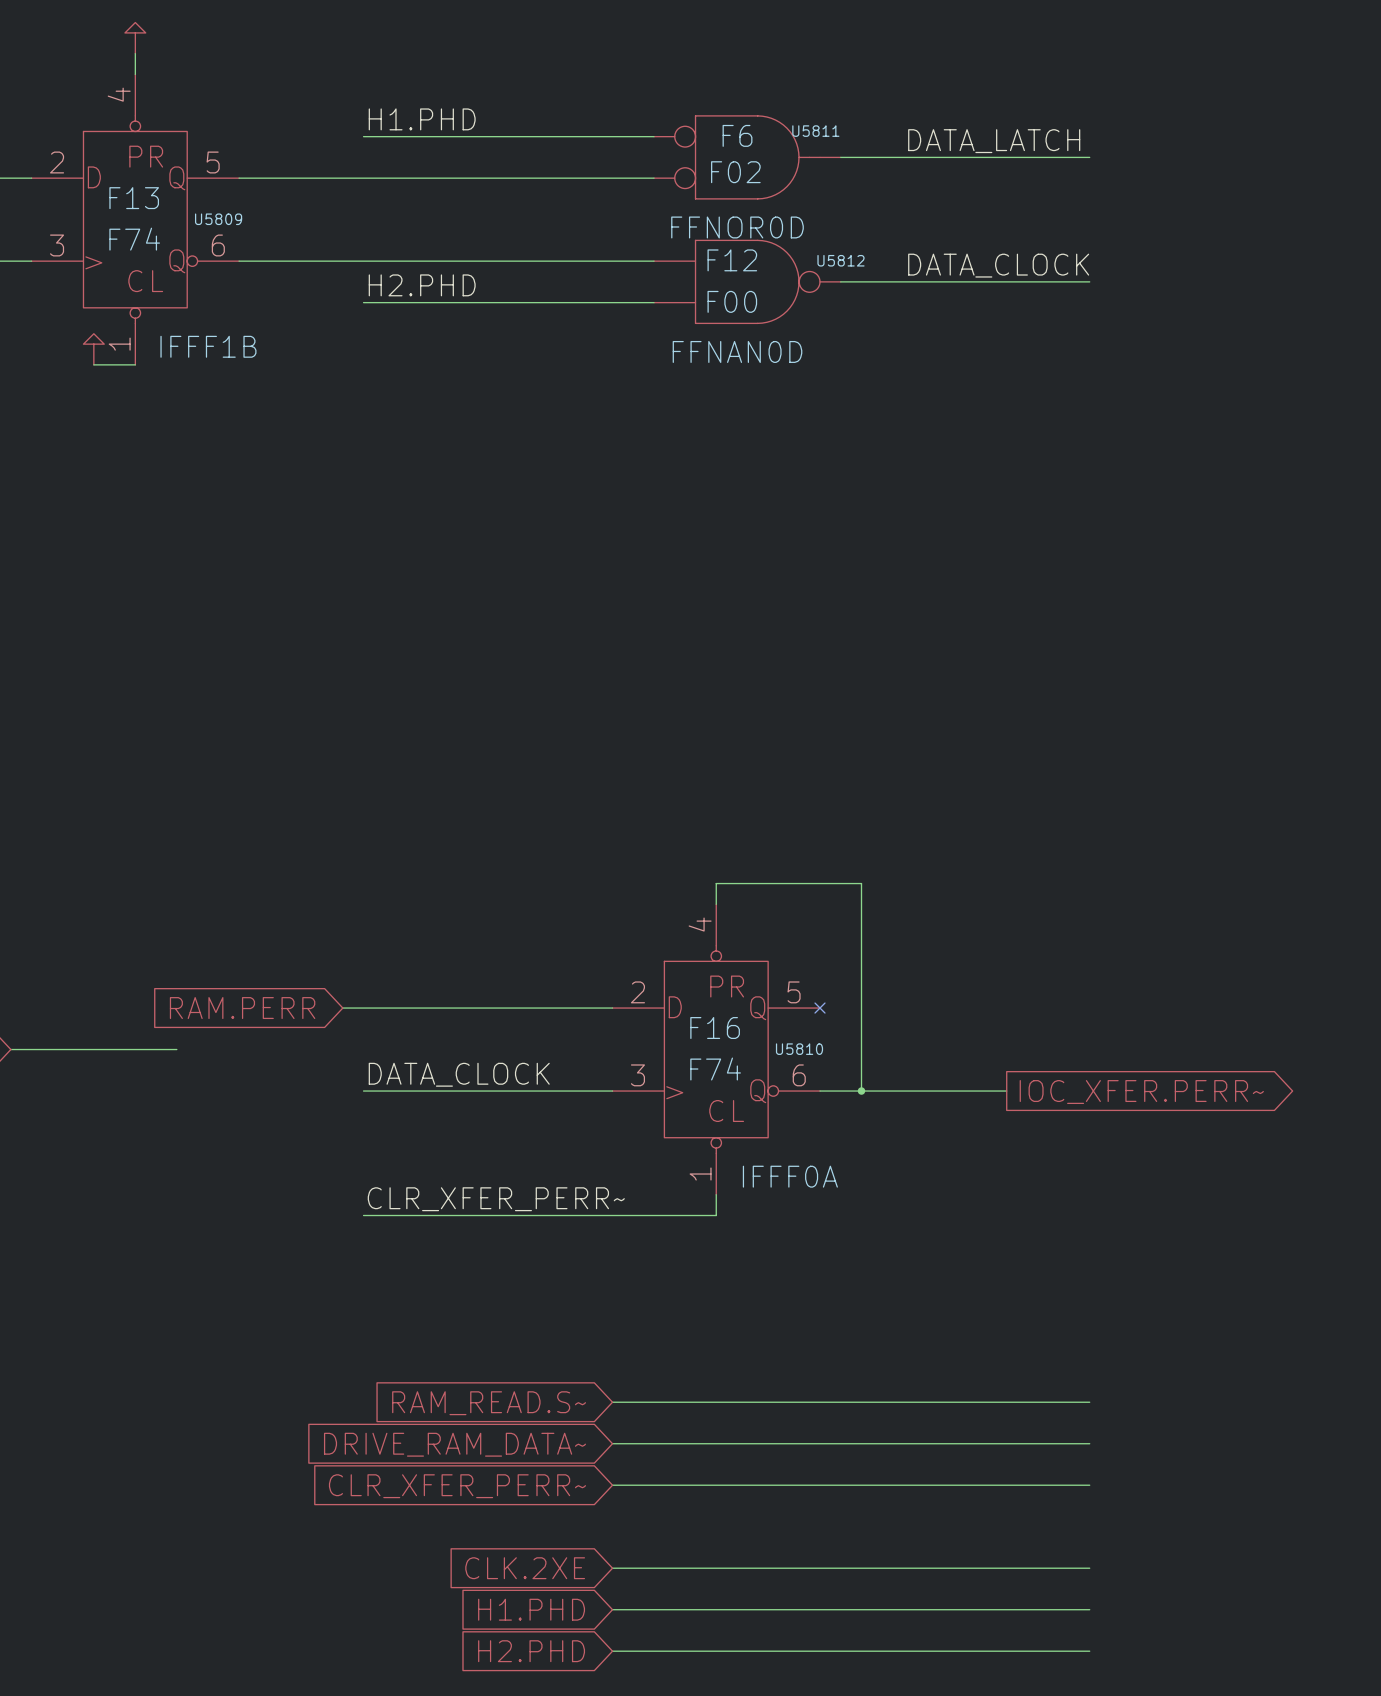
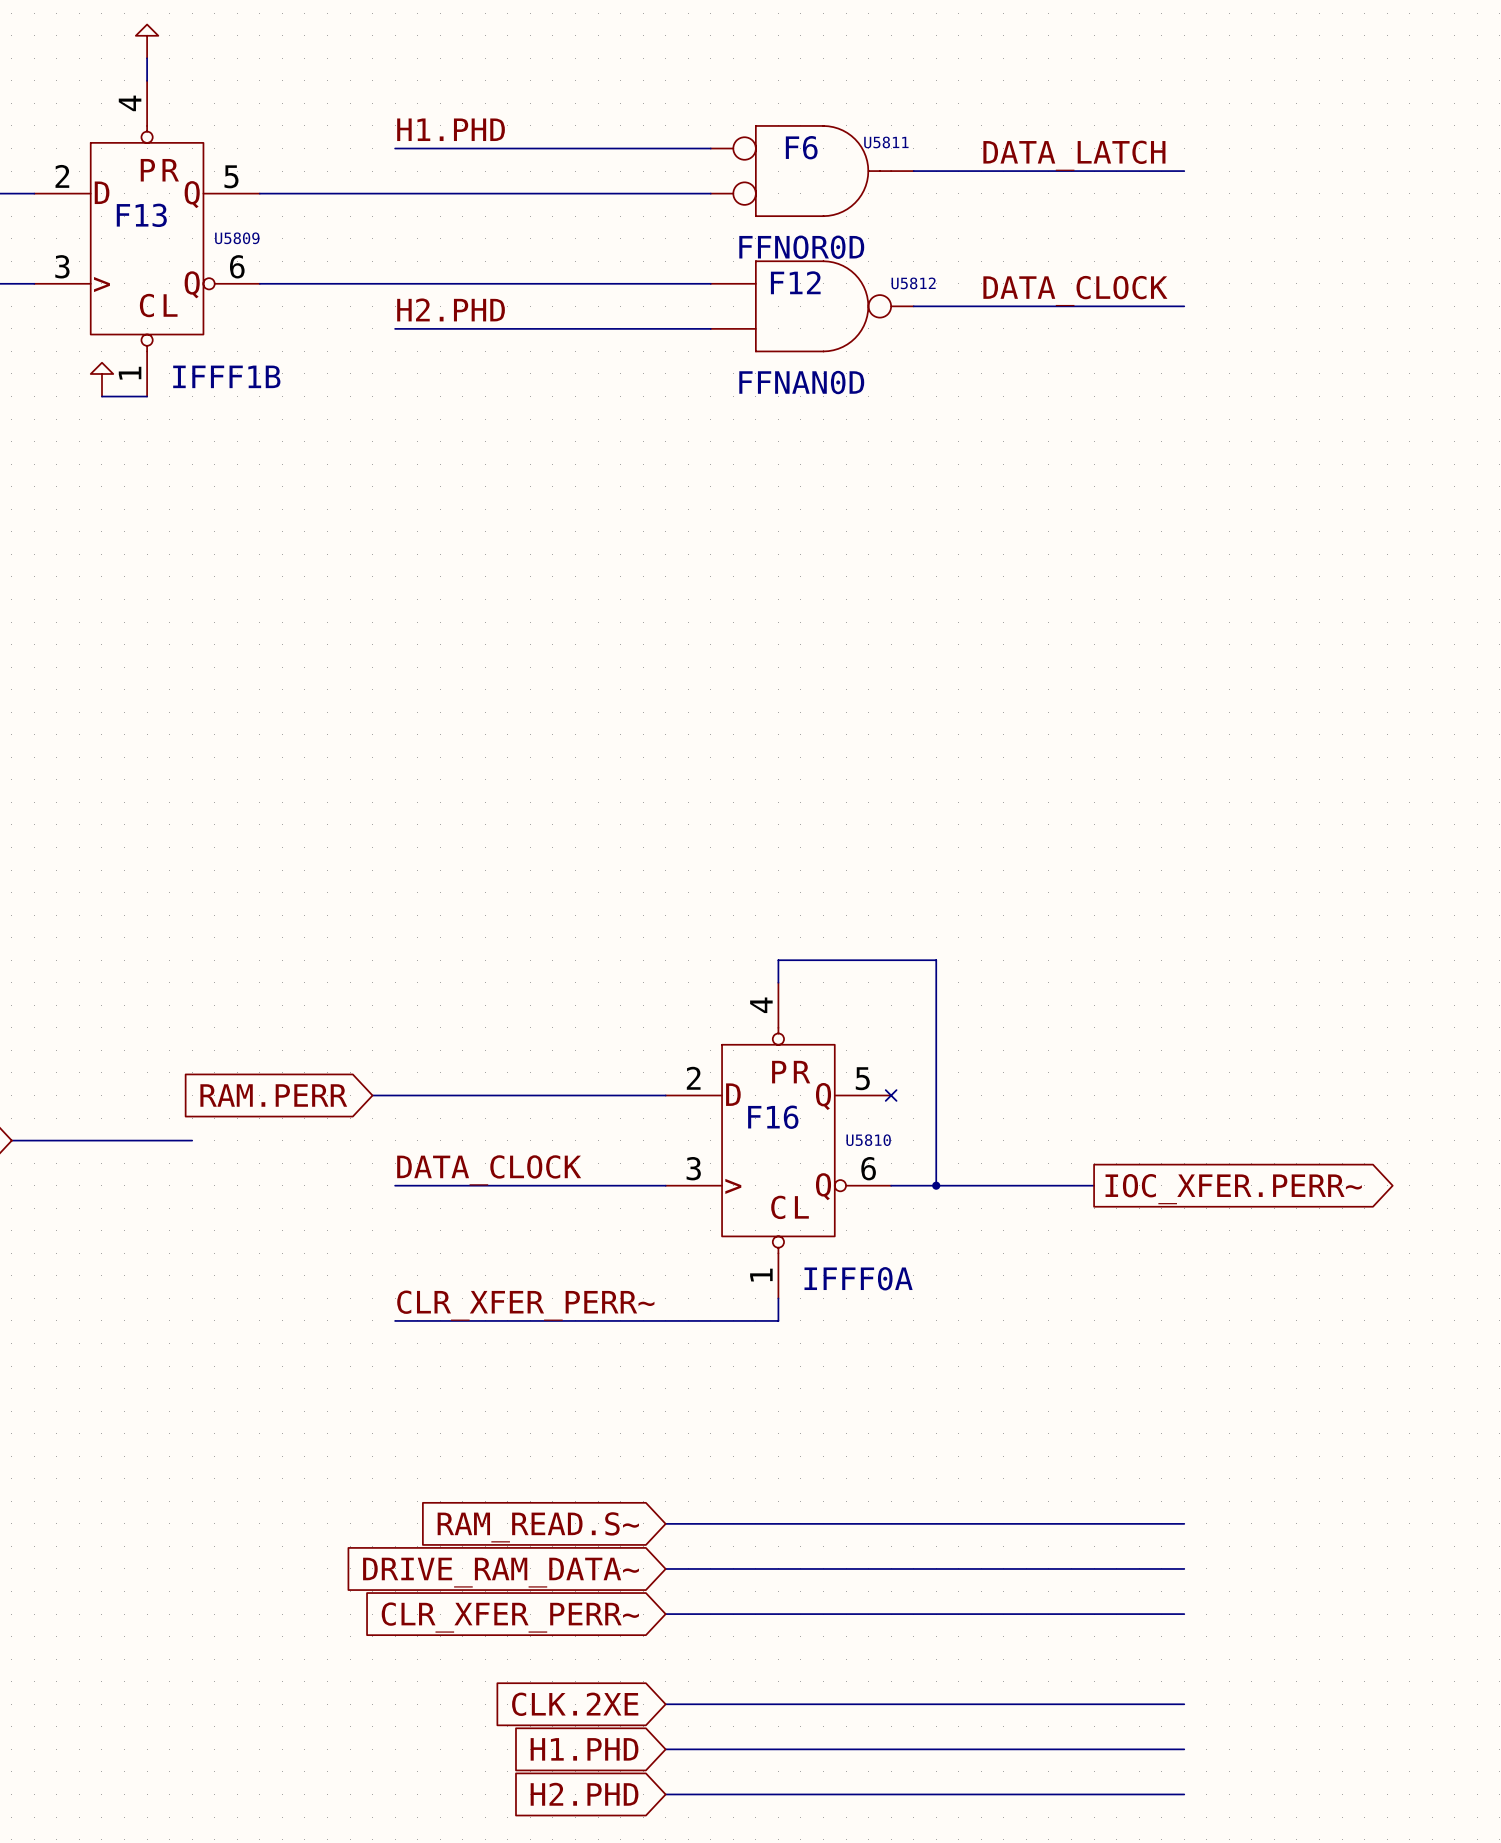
U5811 value: F02 (735, 172) -> none
U5809 value: F74 (134, 239) -> none
U5812 value: F00 (732, 301) -> none
U5810 value: F74 (715, 1069) -> none

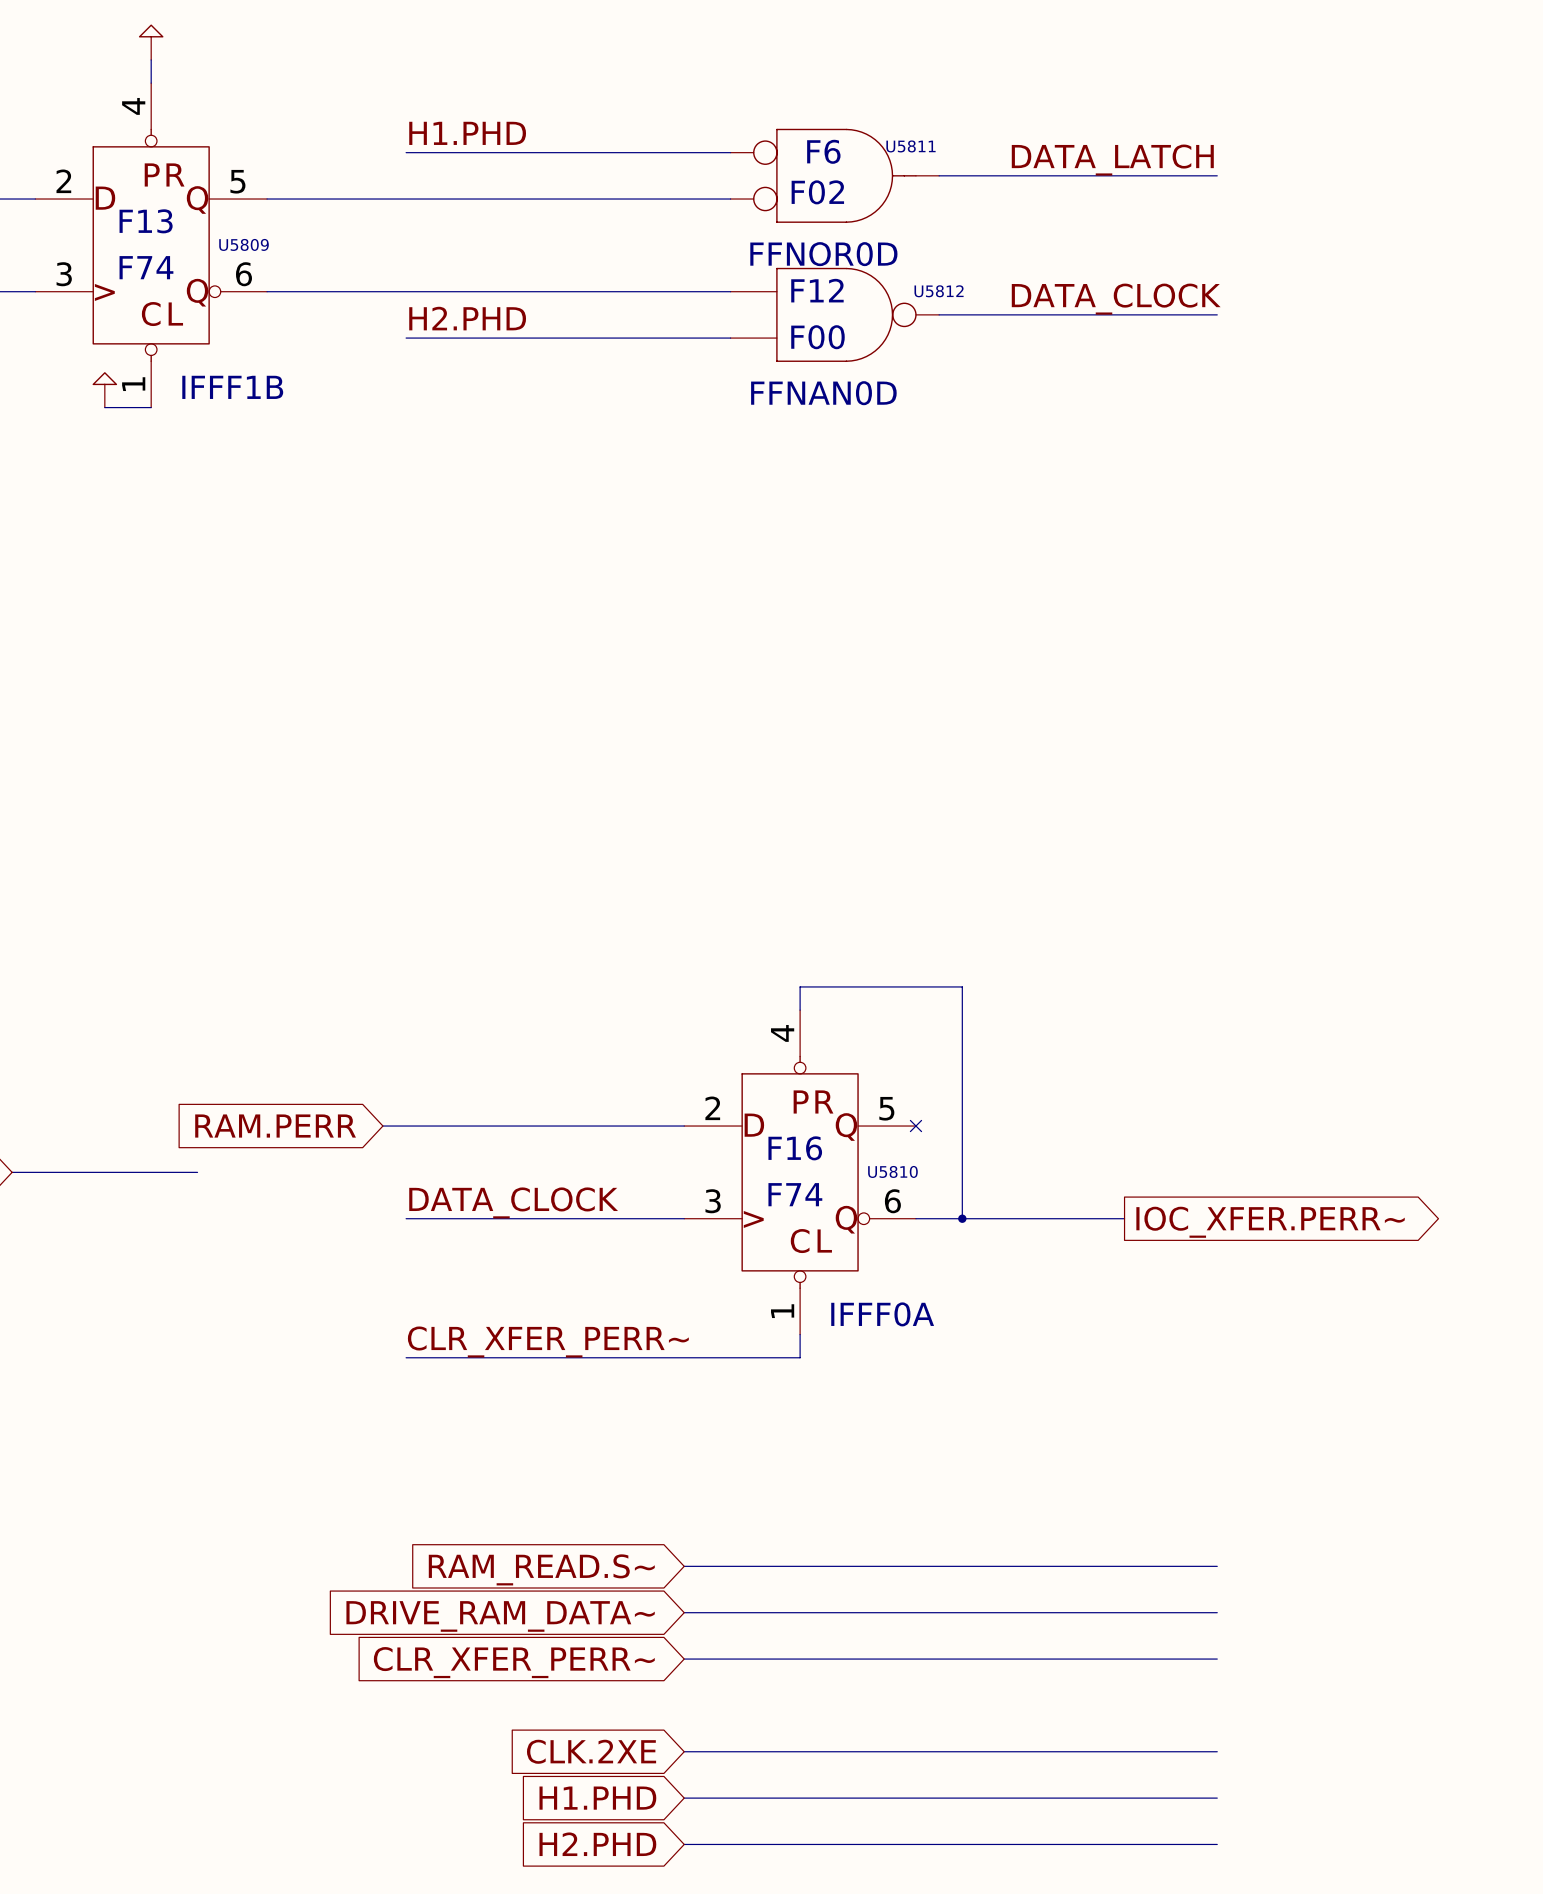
U5811 value: none -> F02 (817, 192)
U5809 value: none -> F74 (146, 267)
U5812 value: none -> F00 (817, 337)
U5810 value: none -> F74 (795, 1194)

